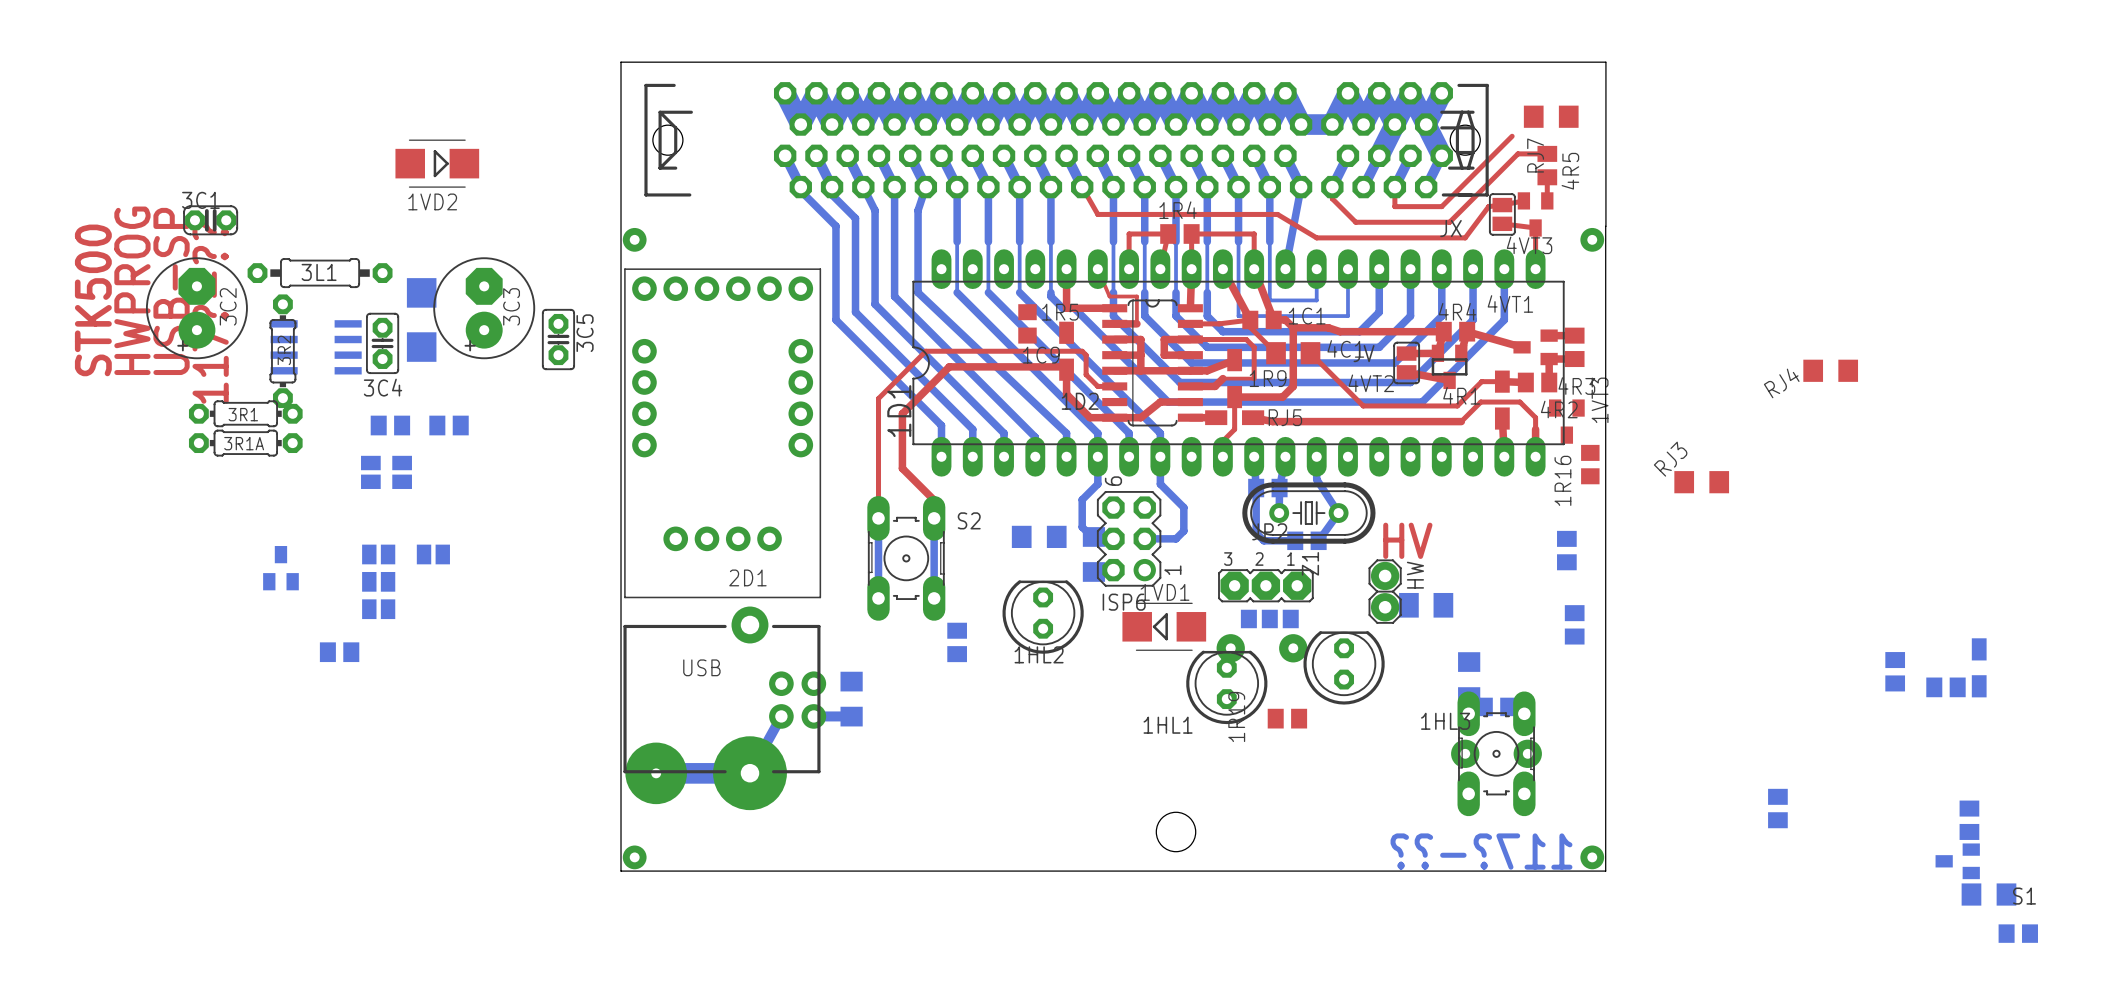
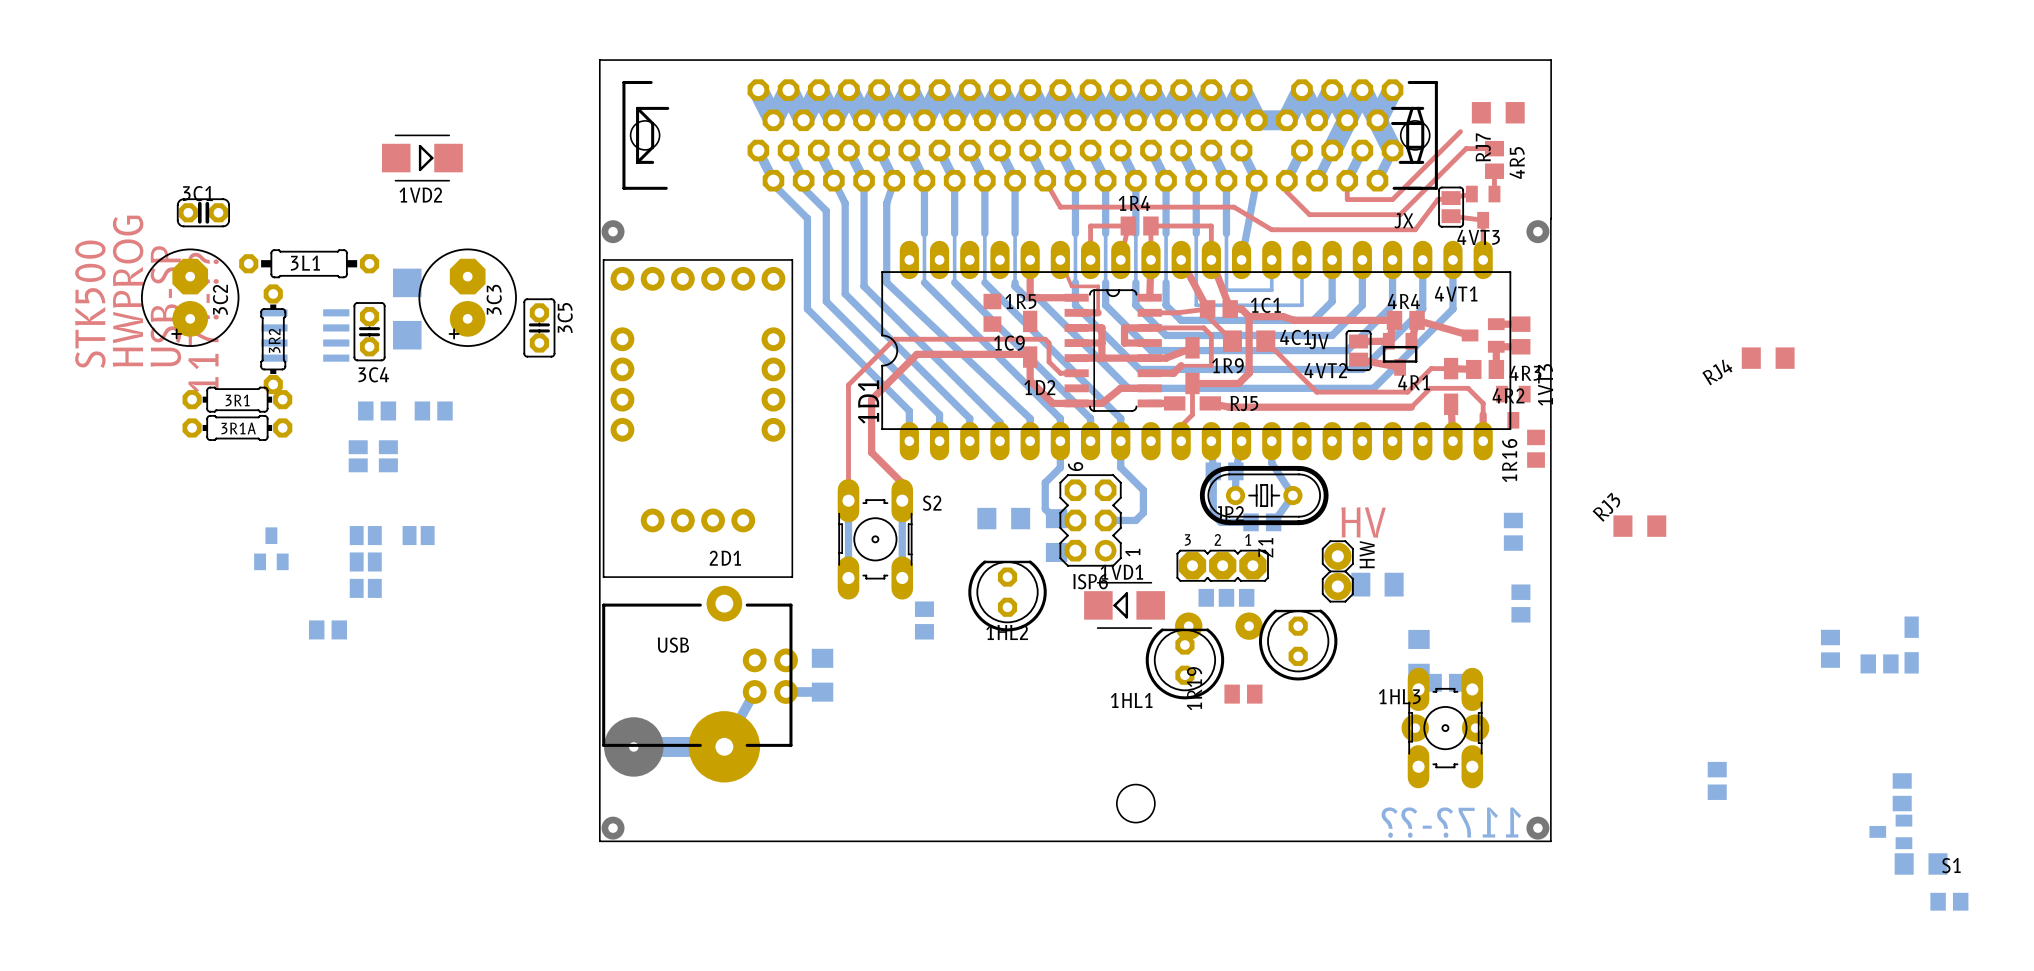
RJ3 position: (1701, 482) -> (1639, 526)

